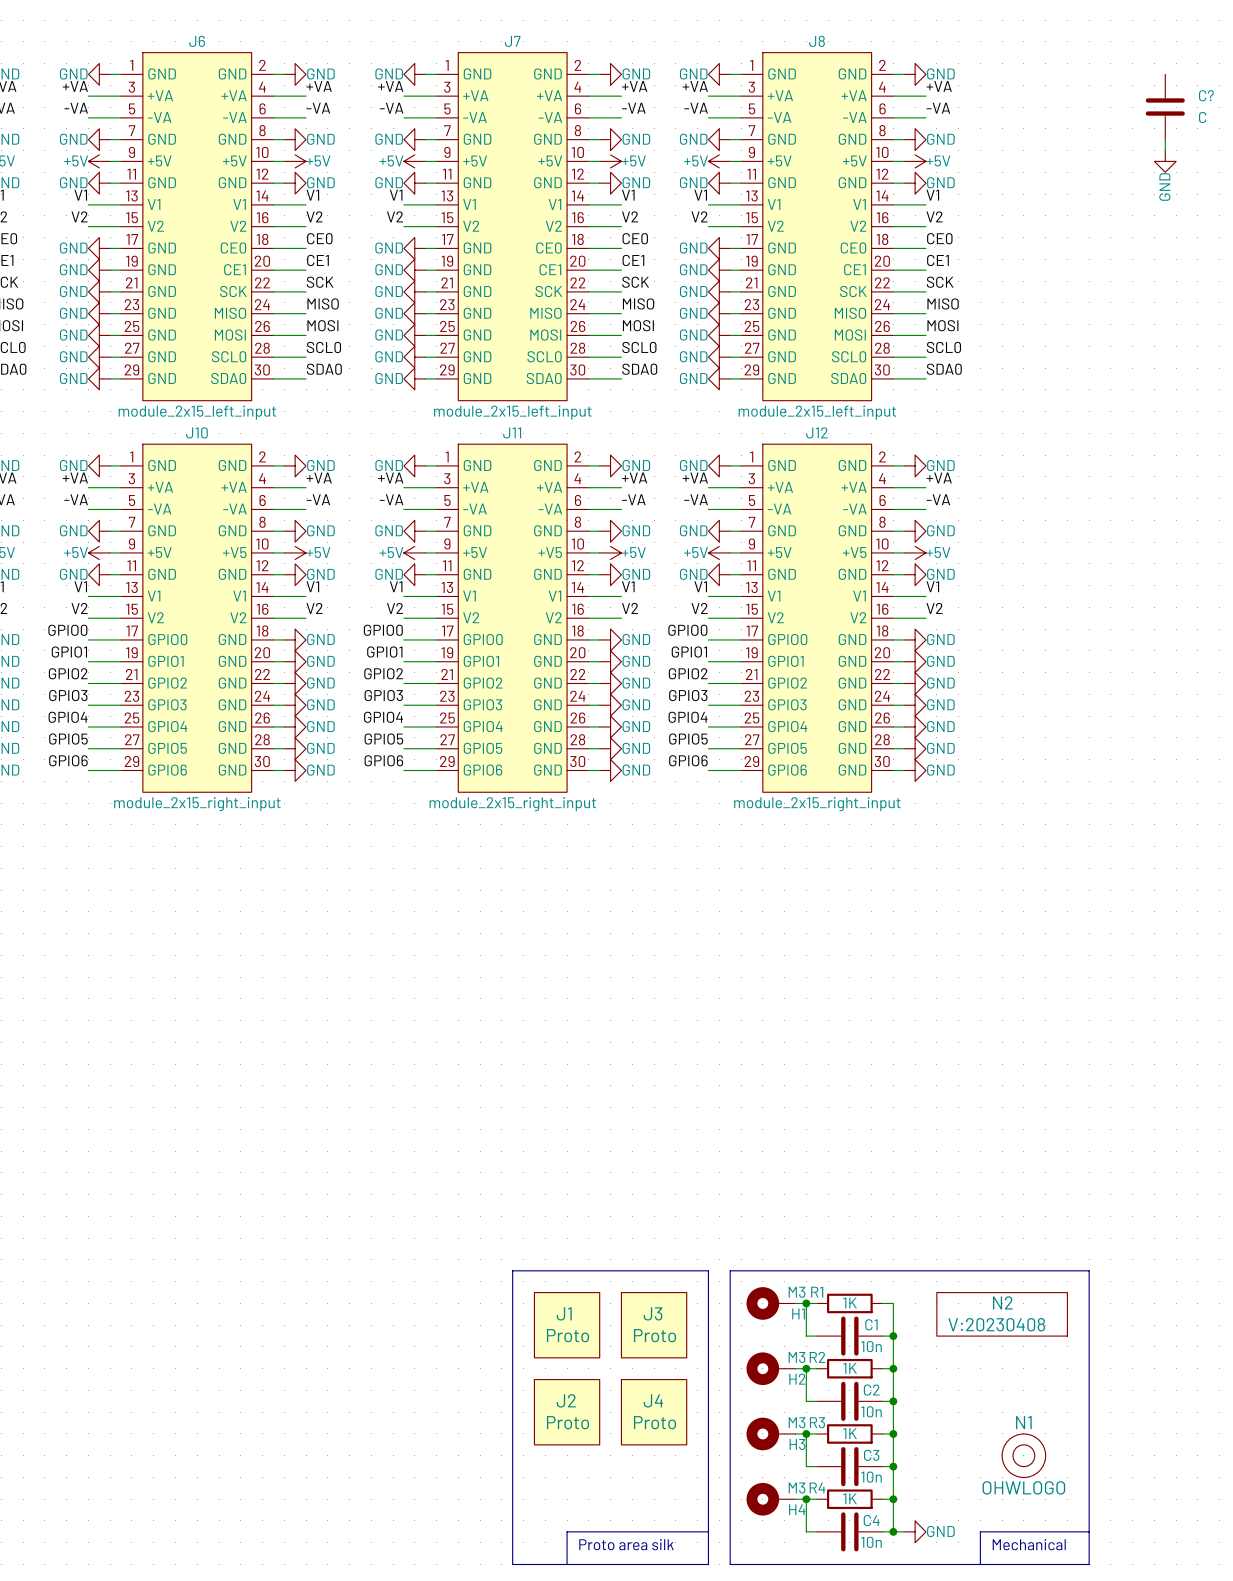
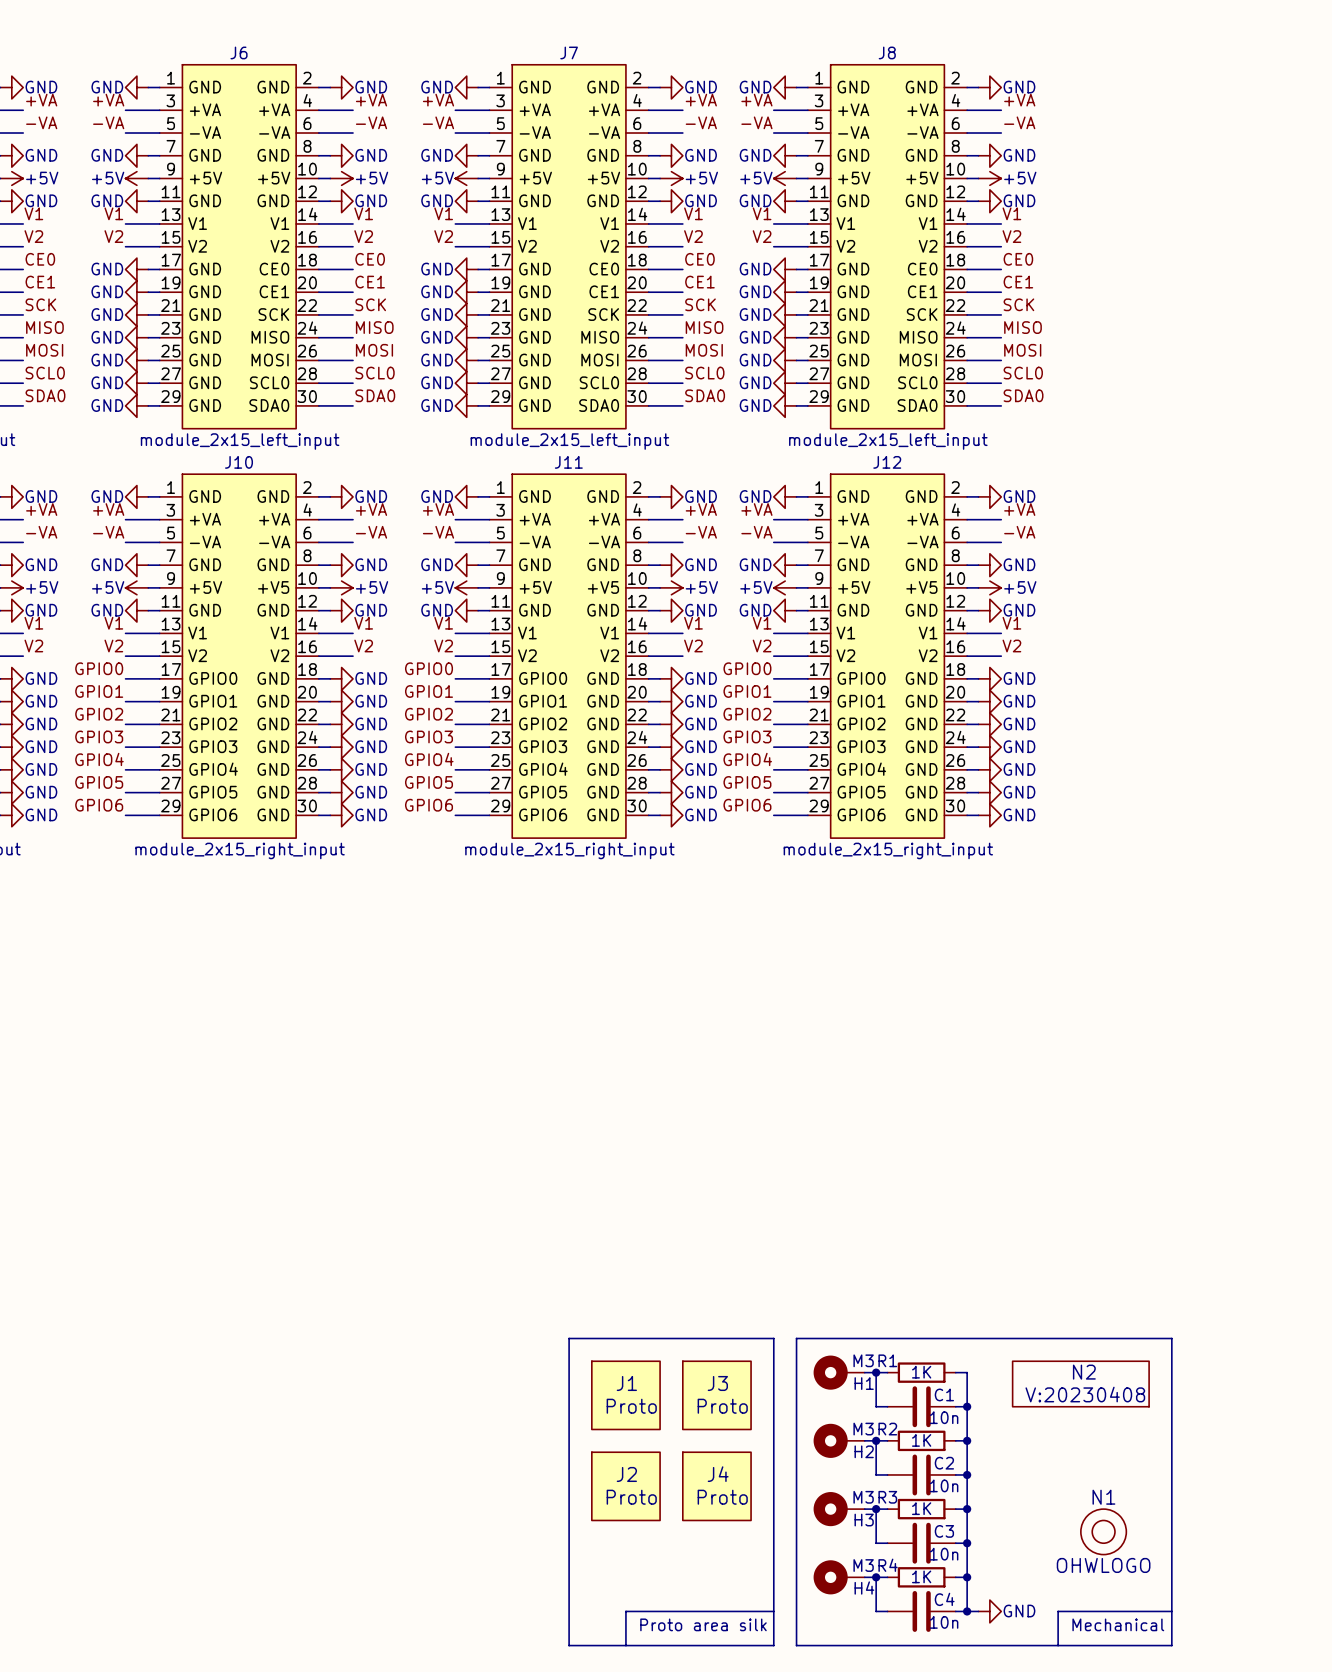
C?: C (1165, 107) -> none
wire: (1165, 139) (1165, 150) -> none
power symbol: GND (1165, 161) -> none

